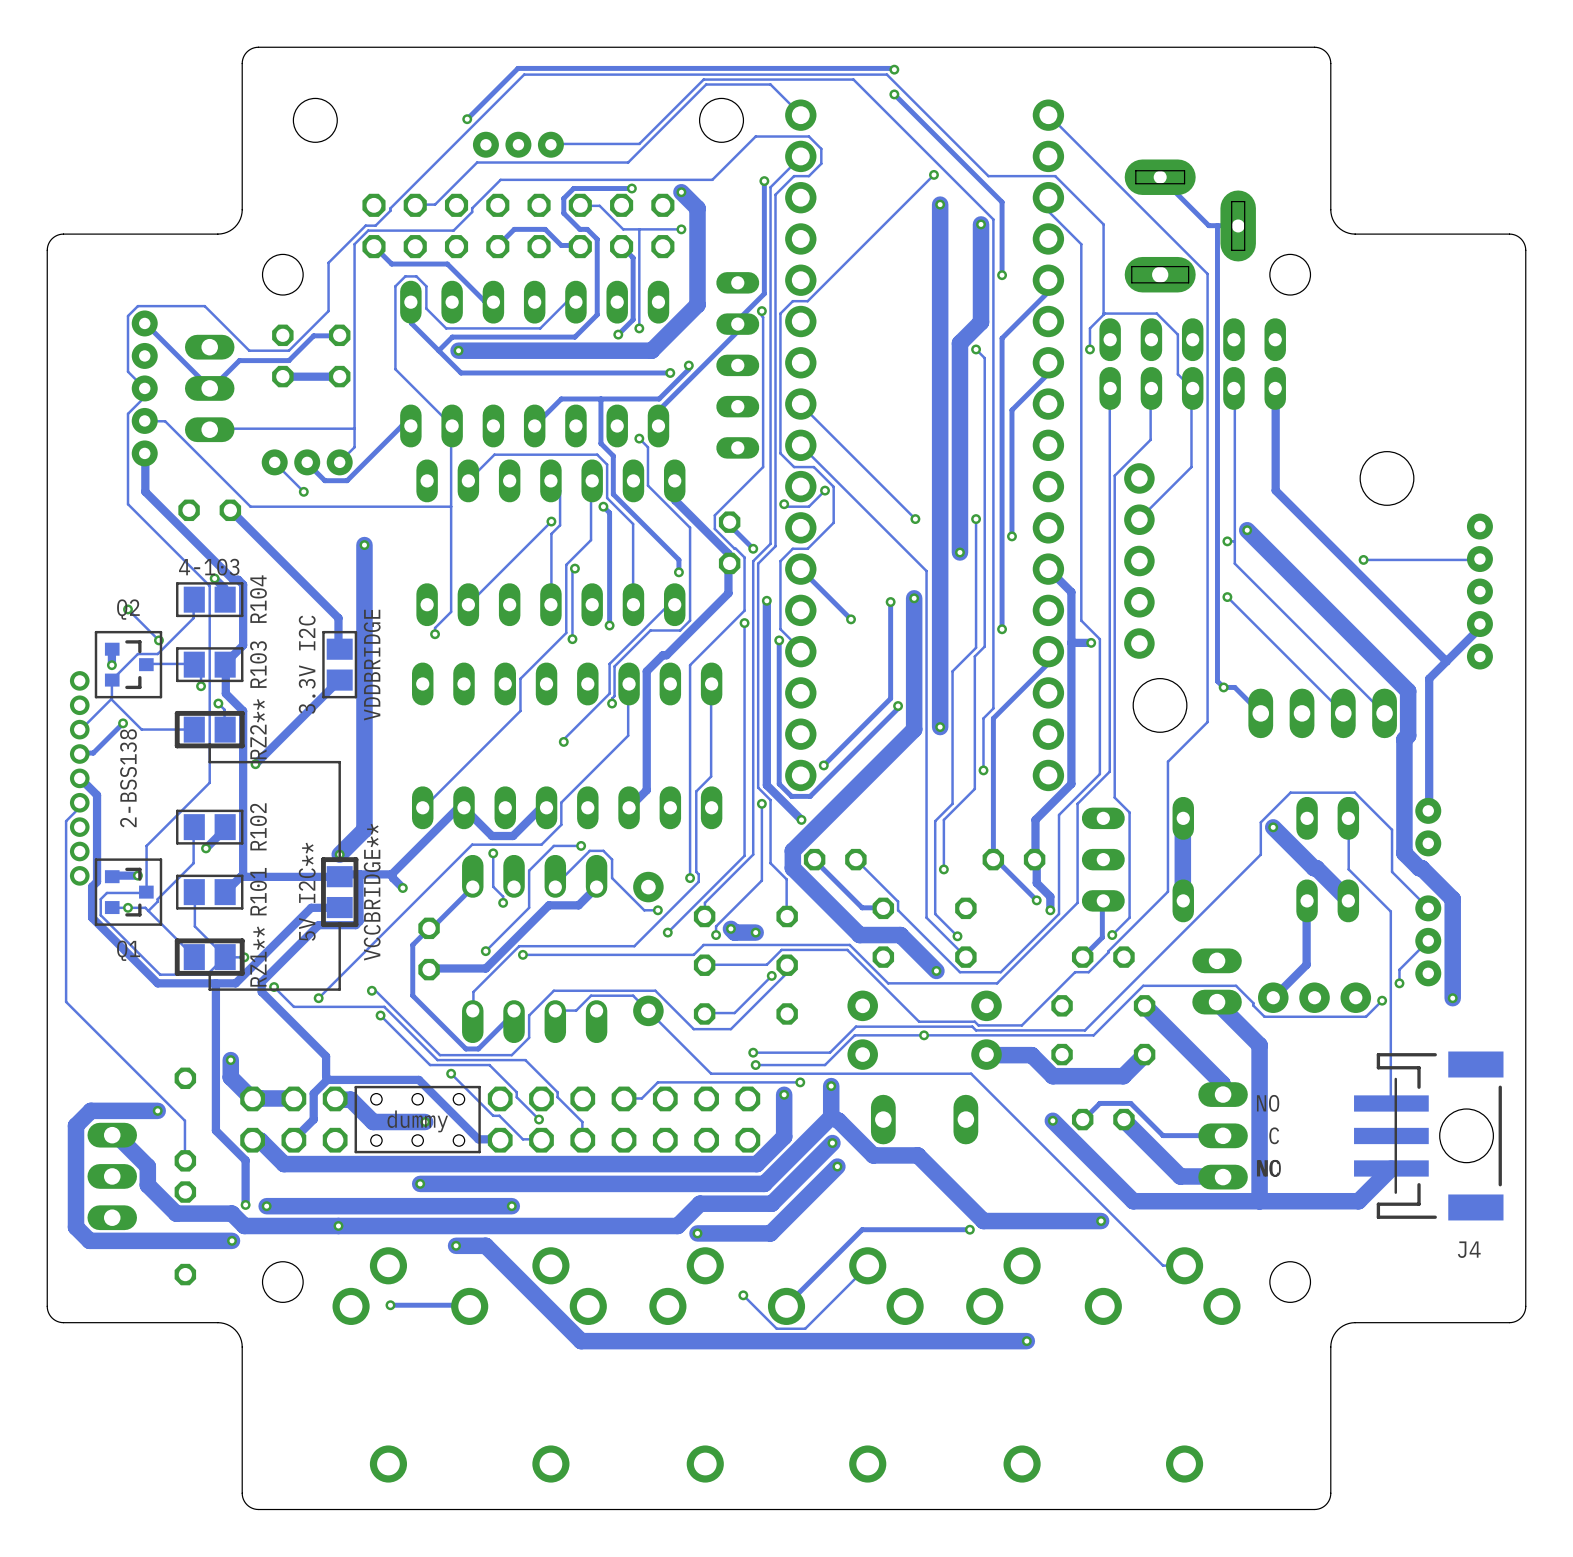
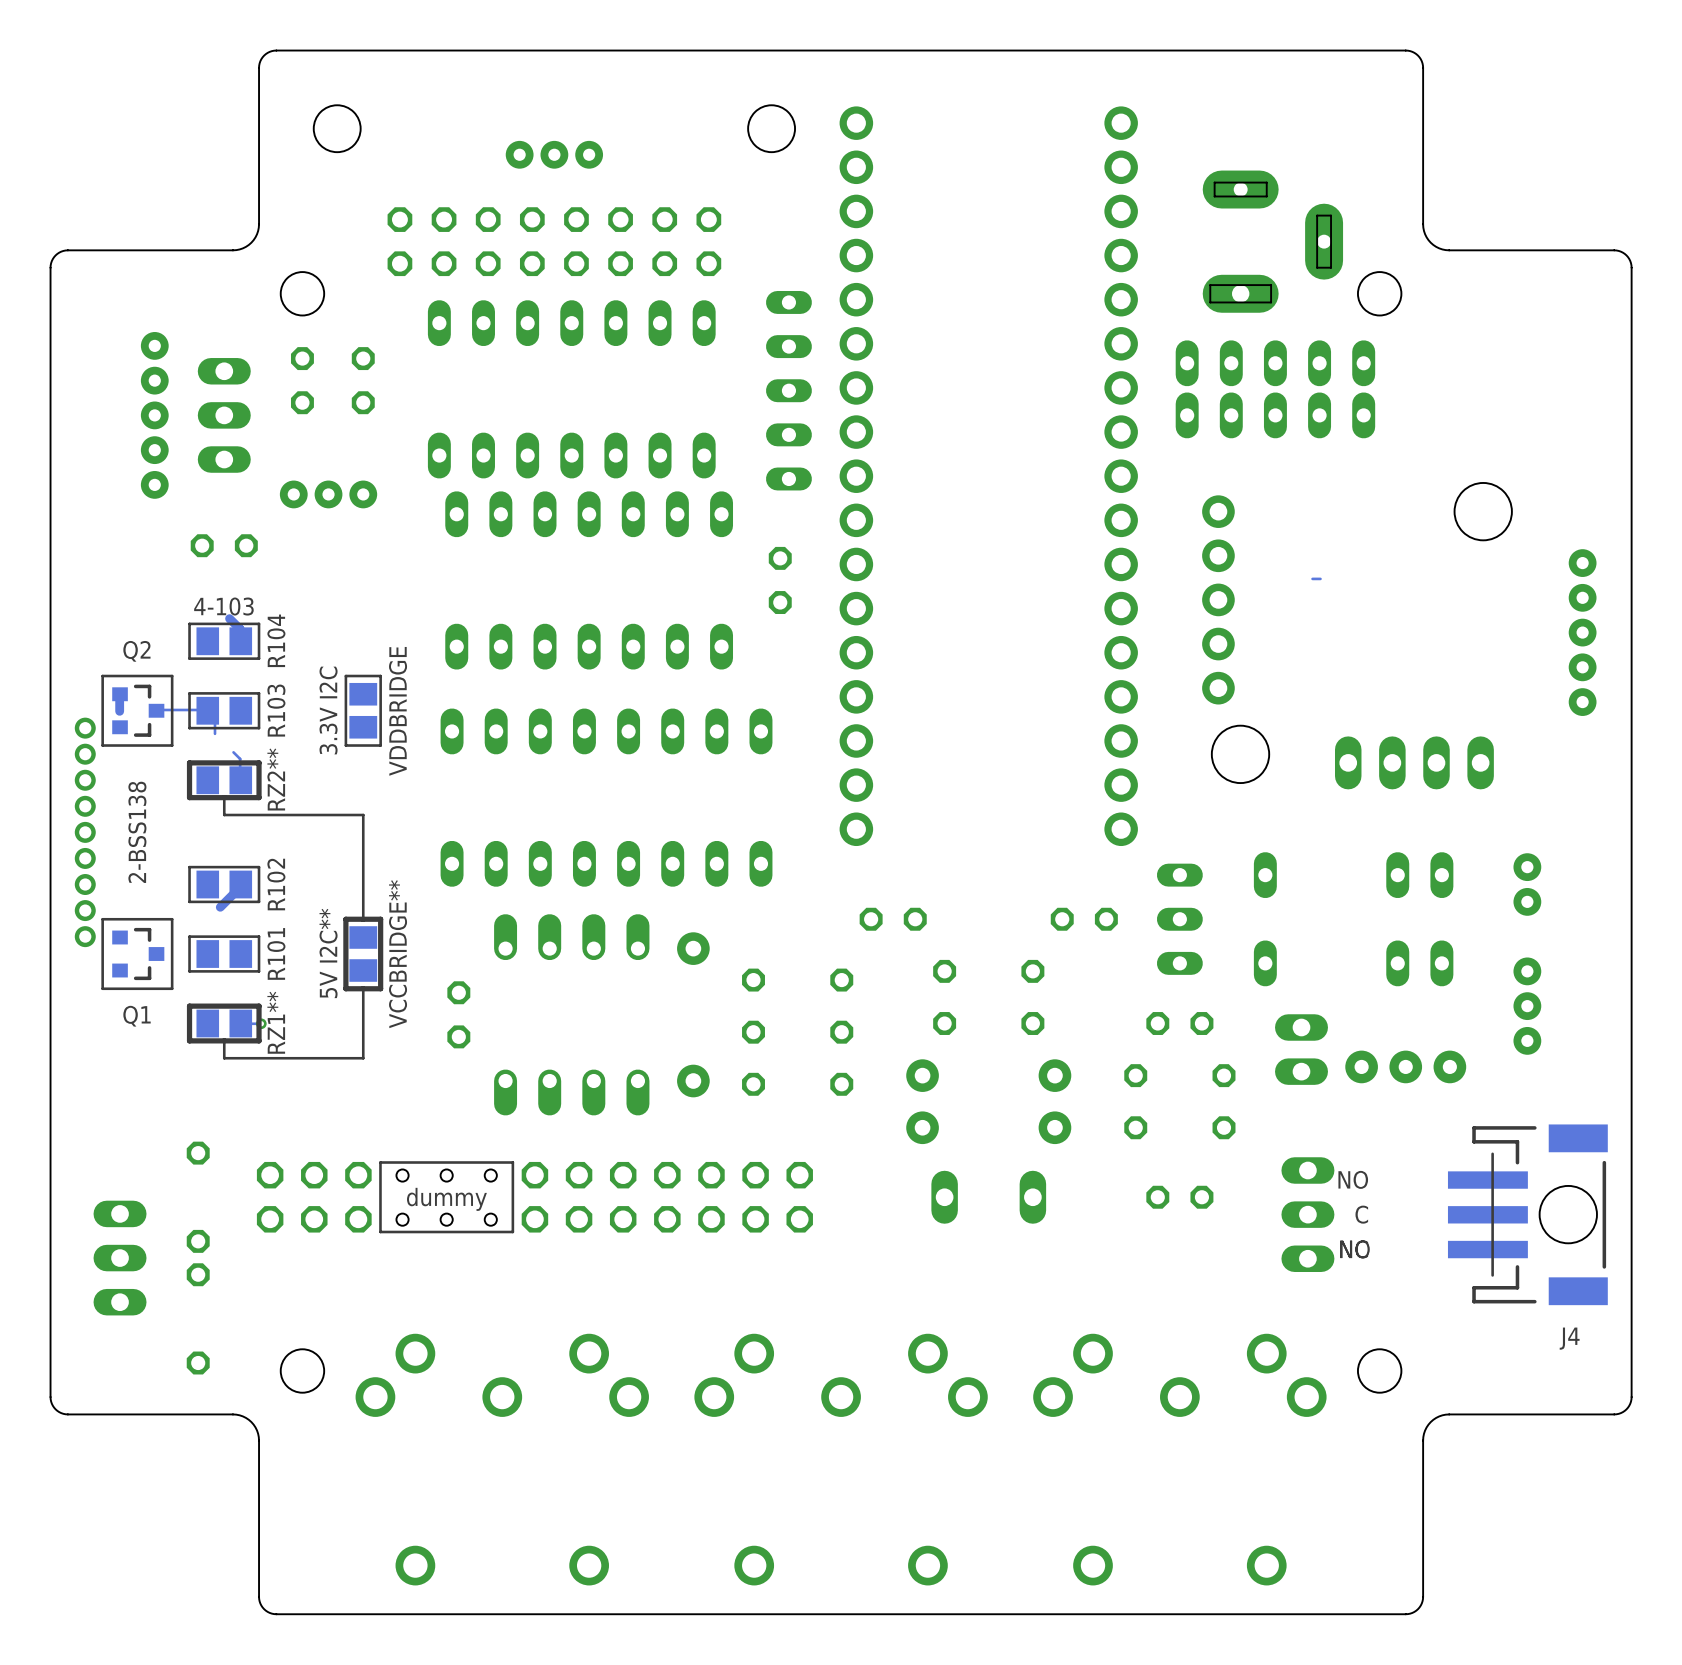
track: (894, 69) (517, 68) (467, 119) -> none
via: (894, 69) -> none
track: (894, 94) (1002, 202) (1002, 275) -> none
via: (894, 94) -> none
track: (800, 115) (770, 84) (706, 84) (628, 162) (477, 162) (435, 204) (415, 205) -> none
track: (1048, 115) (1207, 273) (1207, 722) (1167, 761) (1167, 891) (1088, 972) (1075, 972) (1021, 1025) (978, 1025) (974, 1021) (919, 1021) (847, 949) (781, 949) (766, 964) (704, 965) -> none
via: (467, 119) -> none
track: (550, 144) (639, 143) (703, 79) (853, 79) (993, 219) (993, 708) (983, 718) (983, 770) -> none
track: (800, 156) (770, 187) (770, 543) (753, 561) (753, 854) (704, 902) (704, 916) -> none
track: (933, 174) (807, 301) (792, 301) (780, 313) (780, 453) (794, 467) (813, 467) (833, 486) (833, 522) (807, 548) (792, 548) (780, 561) (780, 629) (800, 651) -> none
via: (933, 174) -> none
track: (1160, 177) (1208, 225) (1238, 225) -> none
track: (764, 181) (764, 293) (738, 319) (737, 332) (659, 410) (658, 425) -> none
via: (764, 181) -> none
track: (631, 188) (573, 188) (563, 198) (563, 213) (579, 229) (587, 229) (597, 239) (597, 314) (574, 337) (452, 337) (438, 350) -> none
via: (631, 188) -> none
track: (681, 192) (697, 208) (697, 304) (651, 350) (458, 350) -> none
via: (681, 192) -> none
track: (1048, 197) (1049, 212) (1081, 244) (1081, 620) (1099, 639) (1099, 774) (1059, 814) (1059, 914) (1000, 972) (959, 972) (898, 910) (898, 901) (855, 859) -> none
track: (940, 204) (940, 727) -> none
via: (940, 204) -> none
track: (580, 205) (599, 205) (623, 229) (681, 229) -> none
track: (981, 224) (981, 322) (959, 343) (959, 552) -> none
via: (981, 224) -> none
track: (1217, 225) (1217, 681) (1223, 687) (1234, 687) (1260, 713) -> none
track: (639, 229) (639, 328) -> none
via: (681, 229) -> none
track: (373, 246) (391, 264) (447, 264) (484, 301) (493, 302) -> none
track: (580, 246) (561, 245) (545, 229) (514, 229) (497, 246) -> none
track: (621, 246) (633, 257) (633, 319) (618, 334) -> none
via: (1002, 275) -> none
track: (1048, 280) (1047, 292) (1002, 338) (1002, 629) -> none
track: (410, 302) (411, 323) (461, 372) (670, 372) -> none
track: (575, 302) (566, 302) (540, 328) (446, 328) (426, 308) (426, 286) (416, 276) (405, 276) (395, 286) (395, 369) (452, 425) (451, 611) (435, 628) (435, 634) -> none
track: (761, 311) (763, 467) (714, 515) (714, 528) (744, 557) (744, 610) (690, 665) (690, 878) -> none
via: (761, 311) -> none
track: (1104, 314) (1103, 224) (1055, 176) (988, 176) (886, 74) (524, 74) (390, 208) (390, 210) (375, 225) (365, 225) (328, 262) (328, 311) (288, 350) (249, 350) (204, 306) (137, 306) (128, 316) (128, 371) (144, 388) (144, 397) (128, 413) (128, 504) (209, 585) (209, 782) (146, 845) (146, 892) (106, 892) (100, 899) (100, 915) (160, 974) (207, 974) (225, 957) (194, 926) (194, 892) -> none
track: (144, 323) (209, 388) (239, 360) (288, 360) (313, 335) (339, 335) -> none
via: (639, 328) -> none
via: (618, 334) -> none
track: (976, 349) (984, 358) (984, 646) (974, 656) (974, 788) (943, 819) (943, 869) -> none
via: (976, 349) -> none
track: (1089, 349) (1089, 328) (1104, 313) (1156, 313) (1177, 334) (1177, 374) (1192, 388) (1191, 467) (1139, 519) -> none
via: (1089, 349) -> none
via: (458, 350) -> none
track: (1048, 362) (1047, 374) (1011, 410) (1011, 536) -> none
track: (688, 365) (688, 369) (659, 398) (561, 398) (534, 425) -> none
via: (688, 365) -> none
via: (670, 372) -> none
track: (339, 376) (282, 376) -> none
track: (1110, 388) (1109, 771) (1077, 803) (1077, 902) (997, 983) (888, 983) (849, 944) (703, 944) (693, 954) (522, 954) -> none
track: (1151, 388) (1150, 439) (1114, 475) (1114, 797) (1129, 812) (1129, 917) (1112, 935) -> none
track: (1233, 388) (1234, 563) (1384, 713) -> none
track: (1275, 388) (1275, 490) (1446, 661) -> none
track: (600, 398) (600, 443) (613, 455) (613, 494) (678, 559) (678, 572) -> none
track: (800, 404) (915, 519) -> none
track: (144, 420) (165, 421) (250, 506) (451, 506) -> none
track: (410, 425) (401, 426) (347, 480) (324, 480) (307, 462) -> none
track: (354, 428) (209, 429) -> none
track: (639, 438) (647, 447) (647, 485) (690, 527) (690, 620) (680, 630) (650, 630) (614, 666) (614, 696) (612, 698) (612, 703) -> none
via: (639, 438) -> none
track: (800, 445) (926, 571) (926, 917) (965, 957) -> none
track: (144, 453) (145, 491) (233, 579) (238, 579) (243, 584) (243, 645) (225, 664) (225, 693) (243, 710) (243, 876) -> none
track: (274, 462) (303, 491) -> none
track: (339, 462) (354, 447) (354, 244) (368, 230) (453, 230) (472, 212) (472, 208) (500, 179) (712, 179) (755, 136) (808, 136) (821, 148) (821, 163) (808, 176) (794, 176) (775, 194) (775, 546) (758, 563) (758, 787) (770, 800) (770, 863) (786, 879) (787, 916) -> none
track: (468, 480) (494, 454) (597, 454) (607, 464) (607, 498) (633, 524) (633, 604) -> none
track: (550, 480) (560, 490) (560, 525) (551, 533) (550, 604) -> none
track: (592, 480) (591, 540) (566, 564) (566, 632) (520, 678) (520, 710) (422, 807) -> none
track: (674, 480) (675, 500) (728, 553) (728, 593) (666, 655) (662, 655) (646, 671) (646, 790) (629, 807) -> none
track: (825, 490) (808, 506) (786, 506) (784, 504) -> none
via: (825, 490) -> none
via: (303, 491) -> none
via: (784, 504) -> none
track: (603, 506) (609, 512) (609, 625) -> none
via: (603, 506) -> none
track: (230, 510) (338, 618) (339, 649) -> none
via: (915, 519) -> none
track: (976, 519) (976, 647) (952, 671) (952, 803) (935, 821) (935, 914) (957, 936) -> none
via: (976, 519) -> none
track: (551, 521) (468, 604) -> none
via: (551, 521) -> none
track: (729, 522) (729, 525) (753, 548) -> none
track: (1247, 530) (1408, 691) (1408, 735) (1404, 739) (1404, 853) (1452, 899) (1452, 998) -> none
via: (1247, 530) -> none
via: (1011, 536) -> none
via: (1227, 541) -> none
track: (364, 545) (364, 829) (339, 854) -> none
via: (364, 545) -> none
via: (753, 548) -> none
via: (959, 552) -> none
via: (1363, 559) -> none
track: (1479, 559) (1363, 559) -> none
track: (574, 568) (572, 571) (572, 639) -> none
via: (574, 568) -> none
track: (800, 569) (851, 619) -> none
track: (1048, 569) (1071, 592) (1071, 784) (1035, 819) (1034, 859) (1036, 863) (1036, 883) (1050, 896) (1050, 910) -> none
via: (678, 572) -> none
via: (214, 578) -> none
track: (1227, 597) (1343, 713) -> none
via: (1227, 597) -> none
track: (914, 598) (914, 729) (792, 850) (792, 868) (859, 935) (900, 935) (936, 970) -> none
via: (914, 598) -> none
track: (194, 599) (193, 618) (157, 654) (137, 654) (111, 680) (111, 698) (79, 729) -> none
track: (766, 600) (766, 785) (801, 819) -> none
via: (766, 600) -> none
track: (890, 602) (890, 698) (823, 765) -> none
via: (890, 602) -> none
track: (674, 604) (667, 605) (609, 663) (609, 693) (563, 739) (563, 741) -> none
track: (128, 609) (158, 640) -> none
via: (128, 609) -> none
via: (851, 619) -> none
track: (744, 623) (744, 855) (667, 932) -> none
via: (744, 623) -> none
track: (1479, 624) (1478, 629) (1429, 678) (1428, 810) -> none
via: (609, 625) -> none
via: (1002, 629) -> none
via: (435, 634) -> none
via: (572, 639) -> none
via: (158, 640) -> none
track: (779, 640) (779, 784) (791, 796) (810, 796) (898, 708) (898, 706) -> none
via: (779, 640) -> none
track: (1091, 642) (1071, 642) -> none
via: (1091, 642) -> none
track: (1048, 651) (1047, 663) (993, 718) (993, 859) -> none
via: (111, 665) -> none
track: (339, 680) (255, 764) -> none
track: (629, 683) (628, 735) (561, 802) (561, 824) (541, 844) (472, 844) (318, 998) -> none
track: (711, 683) (711, 776) (696, 791) (696, 871) (698, 874) (698, 881) (634, 946) (519, 946) (473, 992) (472, 1010) -> none
via: (201, 686) -> none
via: (1223, 687) -> none
track: (111, 699) (141, 729) (194, 729) -> none
via: (218, 703) -> none
via: (612, 703) -> none
via: (898, 706) -> none
track: (123, 723) (93, 753) (79, 754) -> none
via: (123, 723) -> none
via: (940, 727) -> none
via: (563, 741) -> none
via: (255, 764) -> none
via: (823, 765) -> none
via: (983, 770) -> none
track: (79, 778) (97, 795) (97, 881) (92, 886) (92, 917) (157, 983) (235, 983) (311, 907) (339, 907) -> none
track: (79, 802) (79, 807) (66, 821) (66, 1001) (184, 1120) (185, 1160) -> none
track: (761, 803) (761, 880) (716, 926) (716, 935) -> none
via: (761, 803) -> none
track: (546, 807) (540, 808) (513, 836) (491, 836) (463, 807) (457, 808) (391, 874) -> none
track: (1183, 818) (1183, 900) -> none
track: (1348, 818) (1348, 869) (1390, 911) (1391, 1103) -> none
via: (801, 819) -> none
track: (194, 827) (193, 863) (148, 910) -> none
track: (1273, 827) (1348, 900) -> none
via: (1273, 827) -> none
track: (581, 845) (553, 845) (529, 870) (529, 907) (485, 951) -> none
via: (581, 845) -> none
via: (206, 848) -> none
track: (493, 853) (493, 886) (503, 896) (503, 902) -> none
via: (493, 853) -> none
via: (339, 854) -> none
track: (814, 859) (862, 907) (883, 908) -> none
track: (993, 859) (995, 859) (1036, 900) -> none
via: (943, 869) -> none
track: (359, 874) (359, 921) (355, 925) (318, 925) (261, 982) (261, 992) (326, 1056) (327, 1079) -> none
track: (391, 874) (343, 874) (338, 876) (240, 876) (225, 892) -> none
track: (391, 874) (402, 888) -> none
track: (137, 875) (112, 876) -> none
via: (137, 875) -> none
via: (690, 878) -> none
track: (472, 887) (412, 944) (412, 995) (465, 1048) (478, 1048) (513, 1014) (514, 1010) -> none
track: (555, 887) (589, 850) (603, 850) (612, 859) (612, 878) (644, 910) (657, 910) -> none
track: (596, 887) (578, 905) (548, 905) (485, 968) (429, 969) -> none
via: (402, 888) -> none
via: (1036, 900) -> none
track: (1103, 900) (1102, 937) (1082, 957) -> none
track: (1307, 900) (1306, 964) (1273, 997) -> none
via: (503, 902) -> none
track: (112, 907) (145, 907) (194, 957) -> none
via: (128, 907) -> none
track: (1428, 908) (1392, 871) (1392, 829) (1354, 792) (1290, 792) (1260, 822) (1260, 854) (1085, 1030) (976, 1030) (972, 1026) (855, 1026) (829, 1052) (753, 1052) -> none
via: (657, 910) -> none
via: (1050, 910) -> none
track: (730, 928) (734, 932) (755, 932) -> none
via: (730, 928) -> none
via: (667, 932) -> none
via: (755, 932) -> none
via: (716, 935) -> none
via: (1112, 935) -> none
via: (957, 936) -> none
track: (1428, 940) (1399, 969) (1399, 983) -> none
via: (485, 951) -> none
via: (522, 954) -> none
track: (787, 965) (786, 973) (730, 1029) (693, 1029) (655, 990) (553, 990) (529, 1015) (529, 1037) (511, 1055) (439, 1055) (375, 990) (371, 990) -> none
via: (936, 970) -> none
track: (771, 975) (734, 1013) (704, 1013) -> none
via: (771, 975) -> none
track: (215, 983) (215, 1130) (245, 1160) (245, 1204) -> none
via: (1399, 983) -> none
track: (274, 987) (293, 1006) (384, 1006) (437, 1060) (525, 1060) (557, 1092) (557, 1097) (582, 1122) (582, 1140) -> none
via: (274, 987) -> none
via: (371, 990) -> none
via: (318, 998) -> none
via: (1452, 998) -> none
track: (1382, 1000) (1366, 1016) (1264, 1016) (1236, 985) (1143, 985) (1093, 1035) (854, 1035) (825, 1065) (755, 1065) -> none
via: (1382, 1000) -> none
track: (1217, 1002) (1259, 1045) (1259, 1201) -> none
track: (1144, 1005) (1222, 1083) (1223, 1094) -> none
track: (555, 1010) (576, 1010) (591, 995) (633, 995) (711, 1073) (971, 1073) (1163, 1265) (1184, 1265) -> none
track: (380, 1015) (430, 1065) (489, 1065) (516, 1092) (516, 1097) (539, 1119) -> none
via: (380, 1015) -> none
via: (924, 1035) -> none
via: (753, 1052) -> none
track: (1144, 1054) (1123, 1076) (1052, 1076) (1031, 1055) (986, 1054) -> none
track: (230, 1060) (230, 1077) (251, 1098) (293, 1098) -> none
via: (230, 1060) -> none
via: (755, 1065) -> none
track: (451, 1073) (493, 1115) (499, 1115) (522, 1139) (541, 1140) -> none
via: (451, 1073) -> none
track: (327, 1079) (418, 1079) (478, 1139) (500, 1140) -> none
track: (327, 1079) (313, 1093) (313, 1119) (293, 1140) -> none
track: (800, 1082) (657, 1082) (641, 1098) (624, 1098) -> none
via: (800, 1082) -> none
track: (831, 1086) (831, 1117) -> none
via: (831, 1086) -> none
track: (784, 1094) (784, 1136) (756, 1164) (284, 1164) (260, 1140) (252, 1140) -> none
via: (784, 1094) -> none
track: (335, 1098) (350, 1099) (373, 1122) (425, 1122) -> none
track: (157, 1110) (90, 1110) (76, 1125) (76, 1227) (89, 1240) (232, 1240) -> none
via: (157, 1110) -> none
track: (831, 1117) (764, 1183) (420, 1183) -> none
track: (831, 1117) (838, 1120) (873, 1155) (917, 1155) (983, 1221) (1101, 1221) -> none
via: (539, 1119) -> none
track: (1082, 1119) (1099, 1103) (1130, 1103) (1163, 1135) (1223, 1135) -> none
track: (1123, 1119) (1180, 1176) (1223, 1177) -> none
track: (1052, 1120) (1133, 1201) (1358, 1201) (1391, 1168) -> none
via: (1052, 1120) -> none
via: (425, 1122) -> none
track: (112, 1135) (116, 1135) (147, 1166) (147, 1185) (176, 1213) (232, 1213) (244, 1226) (677, 1226) (699, 1203) (771, 1203) (832, 1143) -> none
via: (832, 1143) -> none
track: (837, 1166) (770, 1233) (697, 1233) -> none
via: (837, 1166) -> none
via: (420, 1183) -> none
via: (245, 1204) -> none
via: (266, 1206) -> none
track: (511, 1206) (266, 1206) -> none
via: (511, 1206) -> none
via: (1101, 1221) -> none
via: (338, 1226) -> none
track: (969, 1229) (862, 1229) (786, 1306) -> none
via: (969, 1229) -> none
via: (697, 1233) -> none
via: (232, 1240) -> none
track: (456, 1245) (485, 1245) (581, 1341) (1026, 1341) -> none
via: (456, 1245) -> none
track: (867, 1265) (805, 1328) (776, 1328) (743, 1295) -> none
via: (743, 1295) -> none
track: (390, 1305) (469, 1306) -> none
via: (390, 1305) -> none
via: (1026, 1341) -> none

